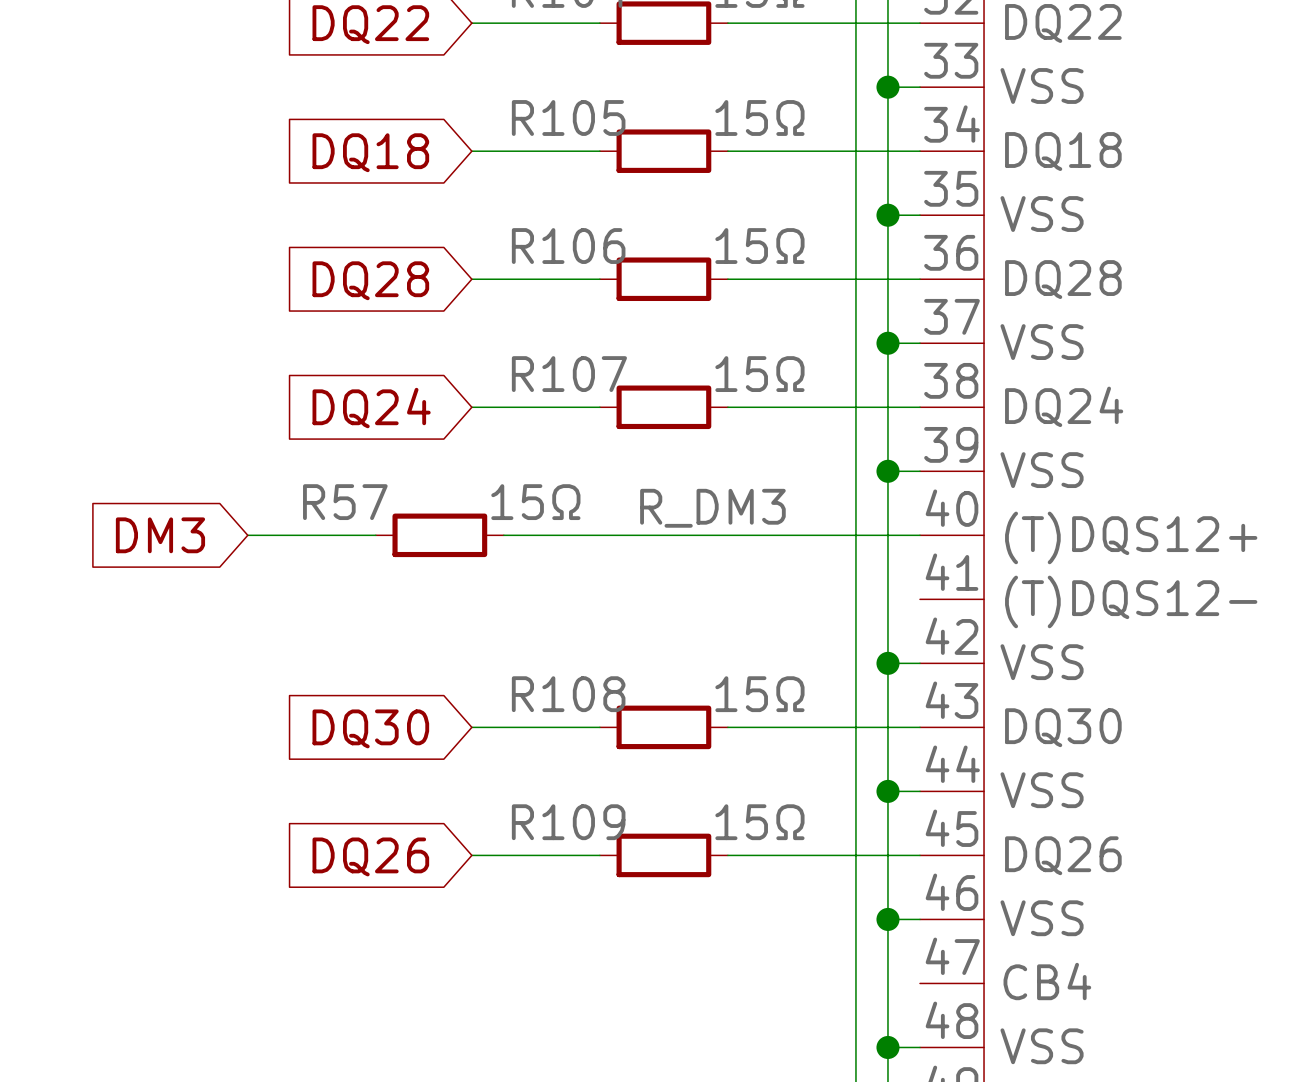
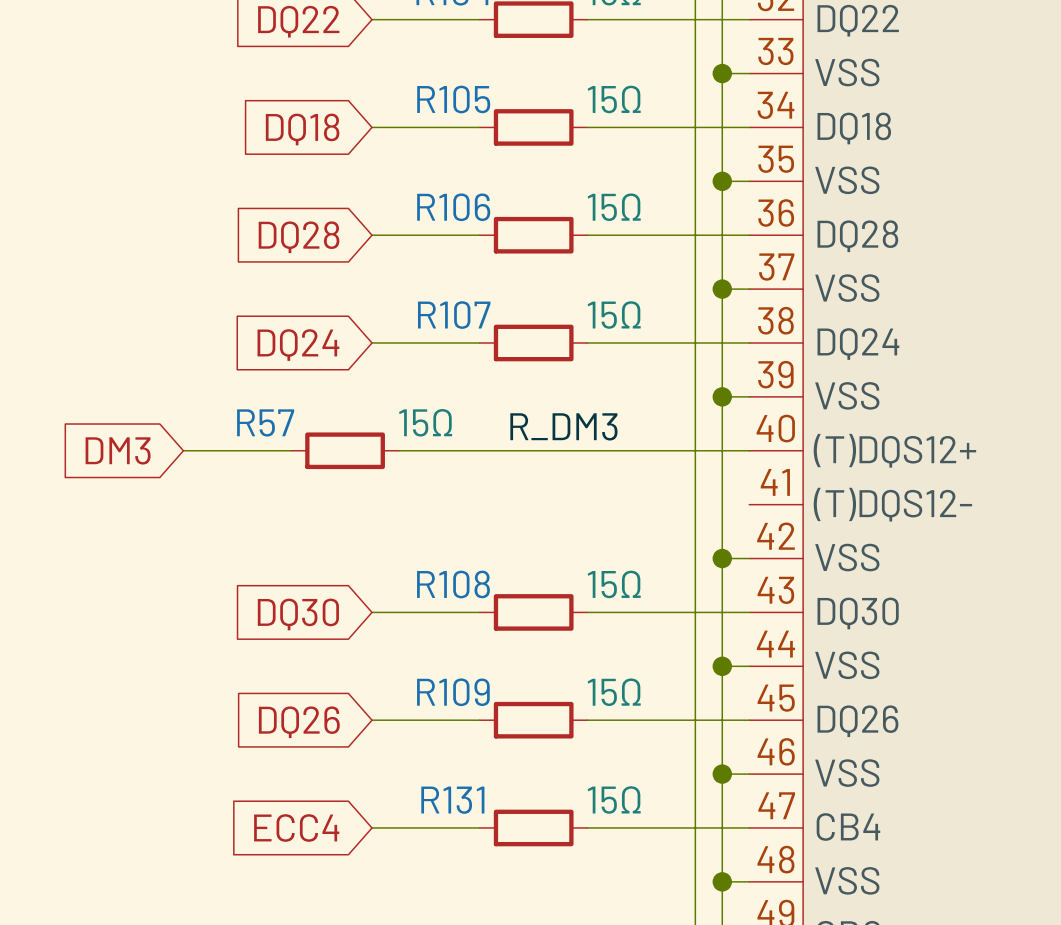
global label: none -> ECC4 (296, 828)
wire: none -> (372, 827) (479, 827)
R131: none -> 15Ω (533, 827)
wire: none -> (587, 827) (749, 827)

